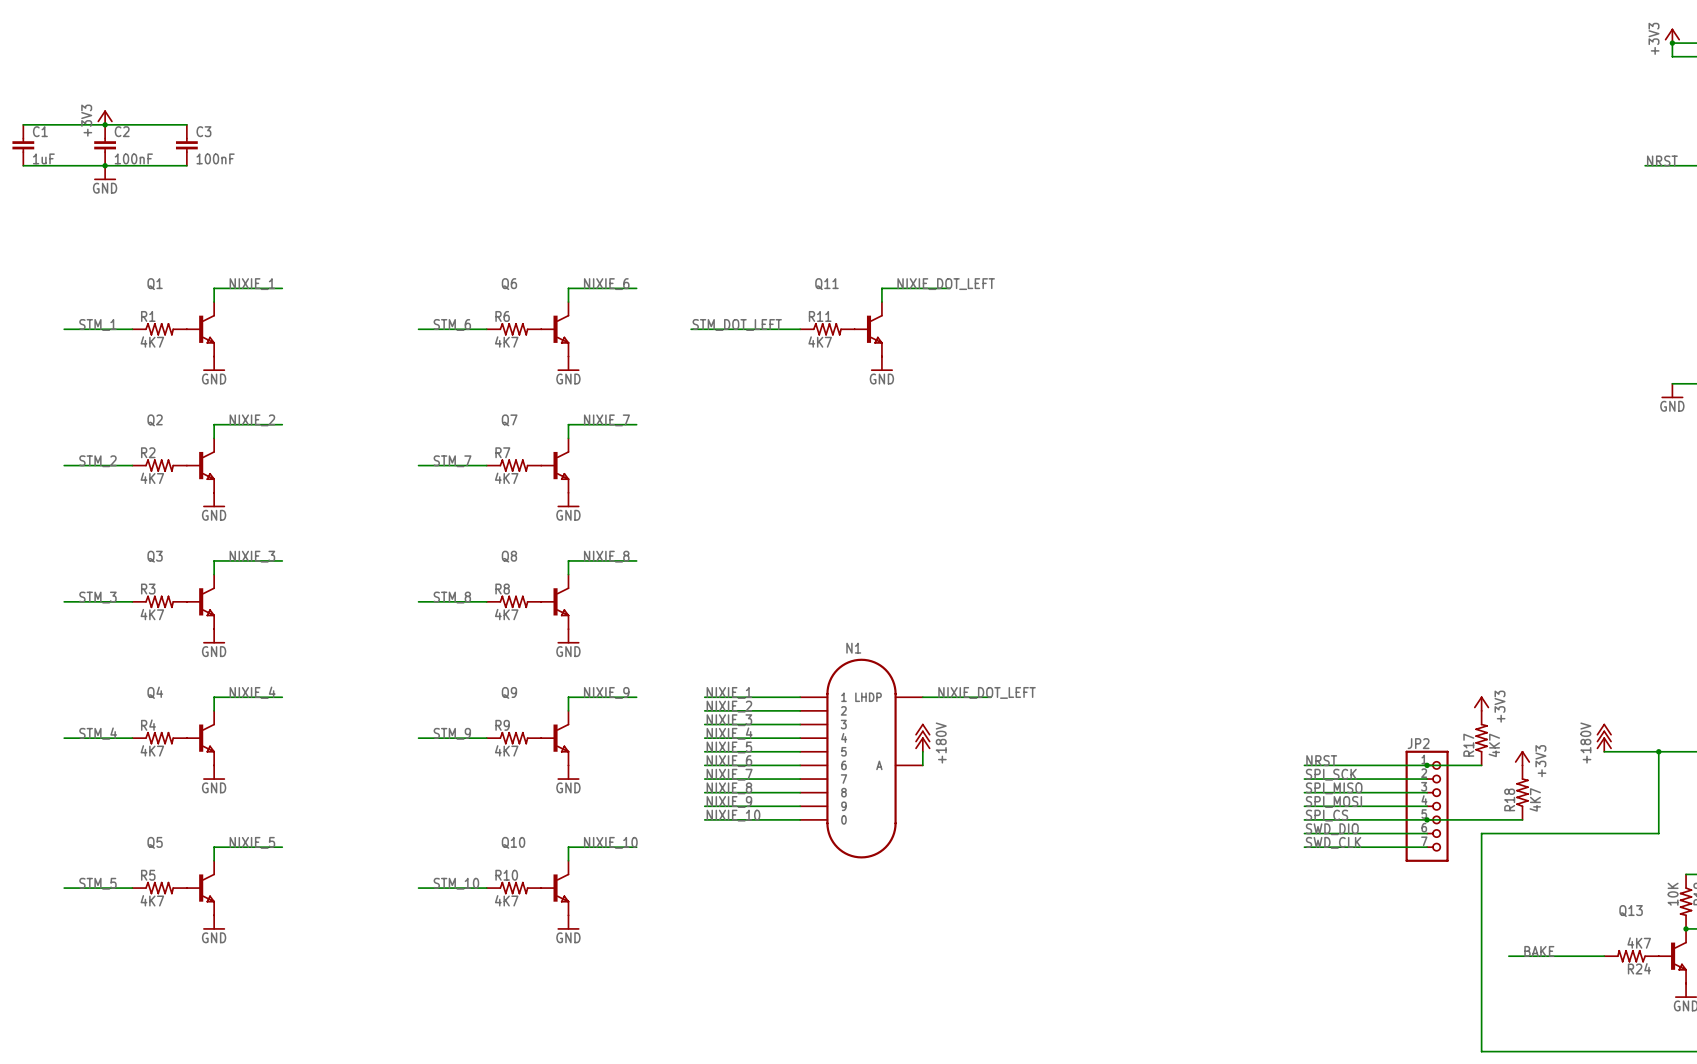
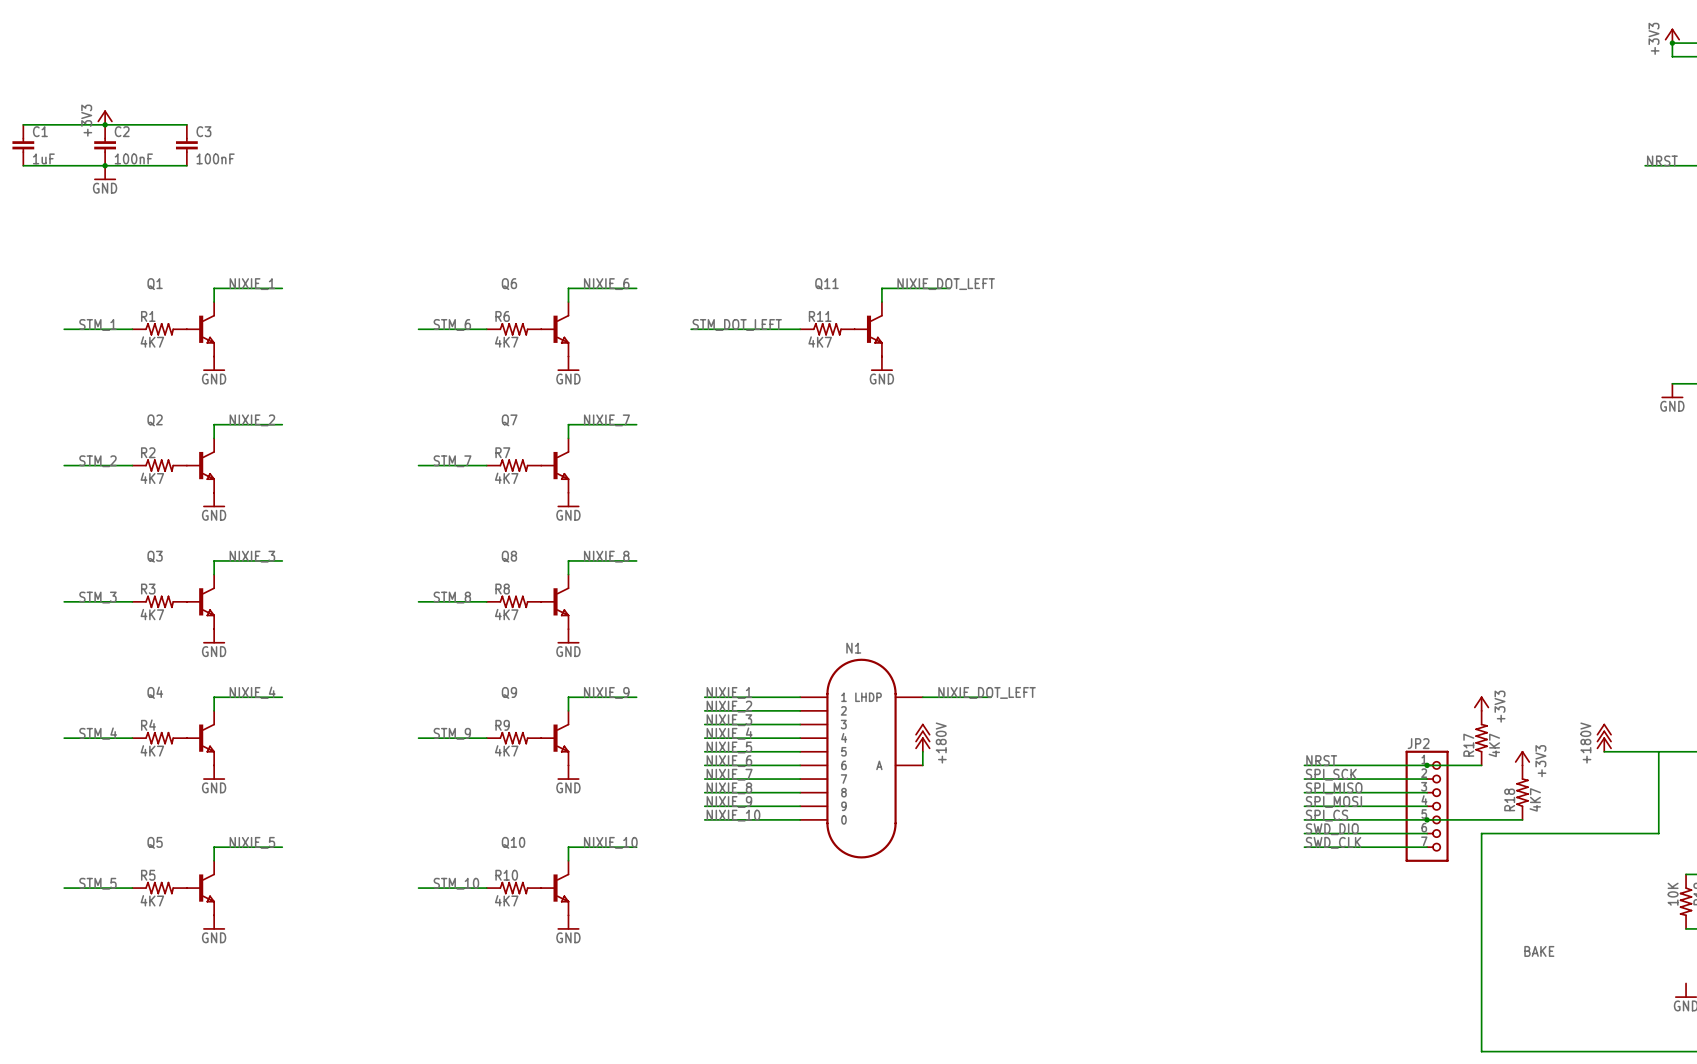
junction: (1658, 751) -> none
junction: (1686, 928) -> none
wire: (1508, 956) (1604, 956) -> none
R24: 4K7 (1631, 956) -> none
Q13: (1672, 956) -> none

